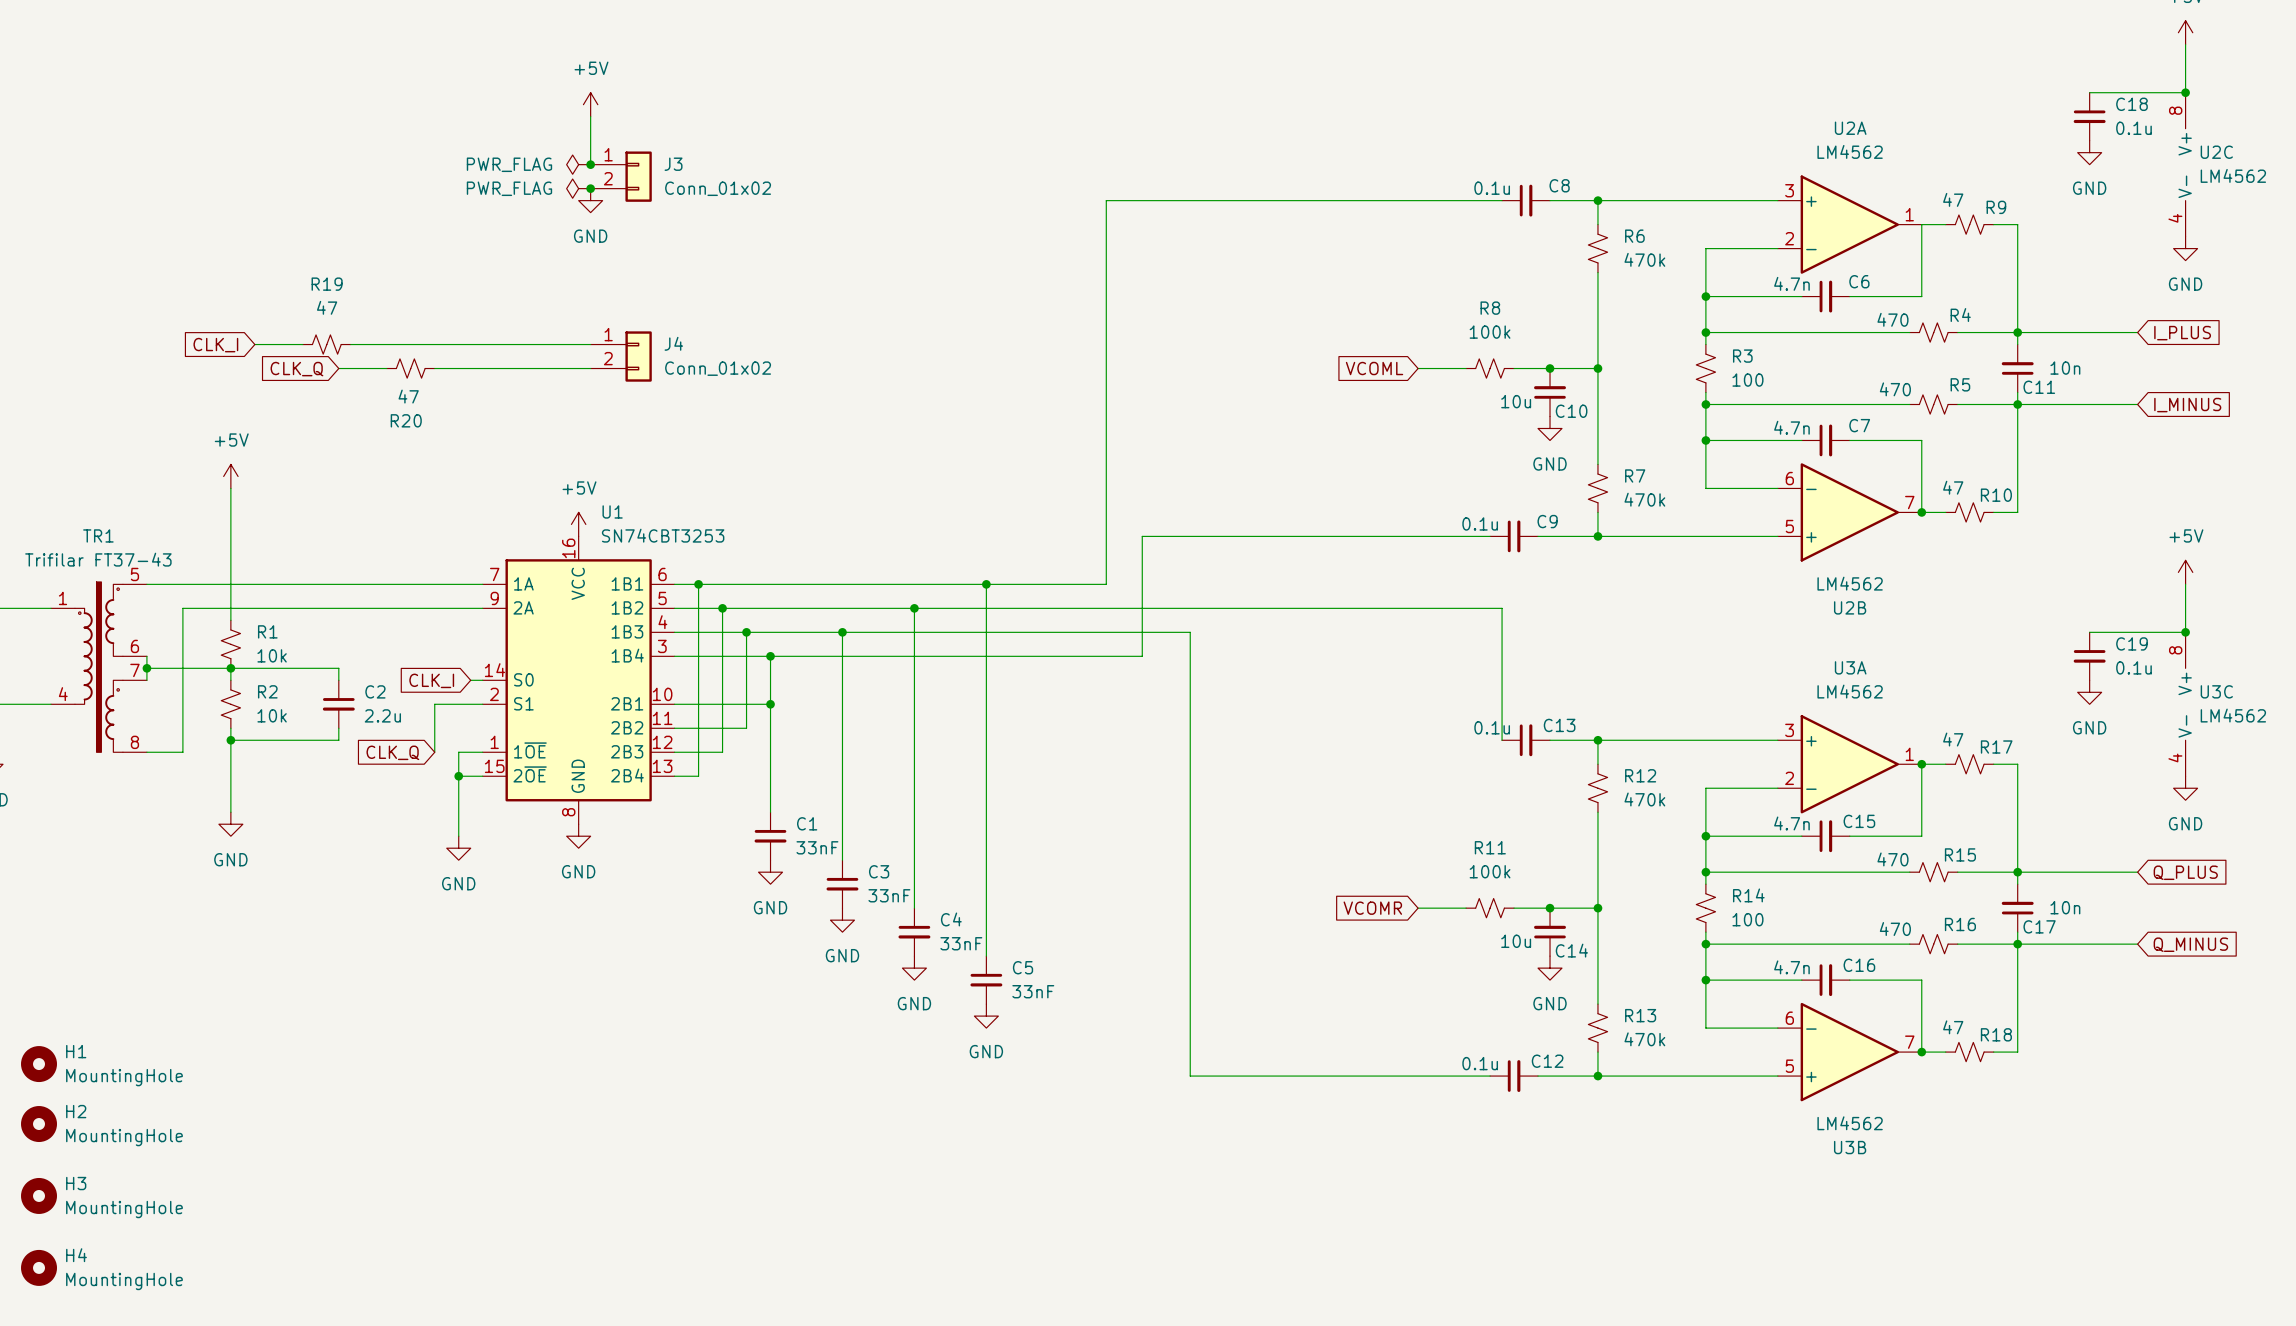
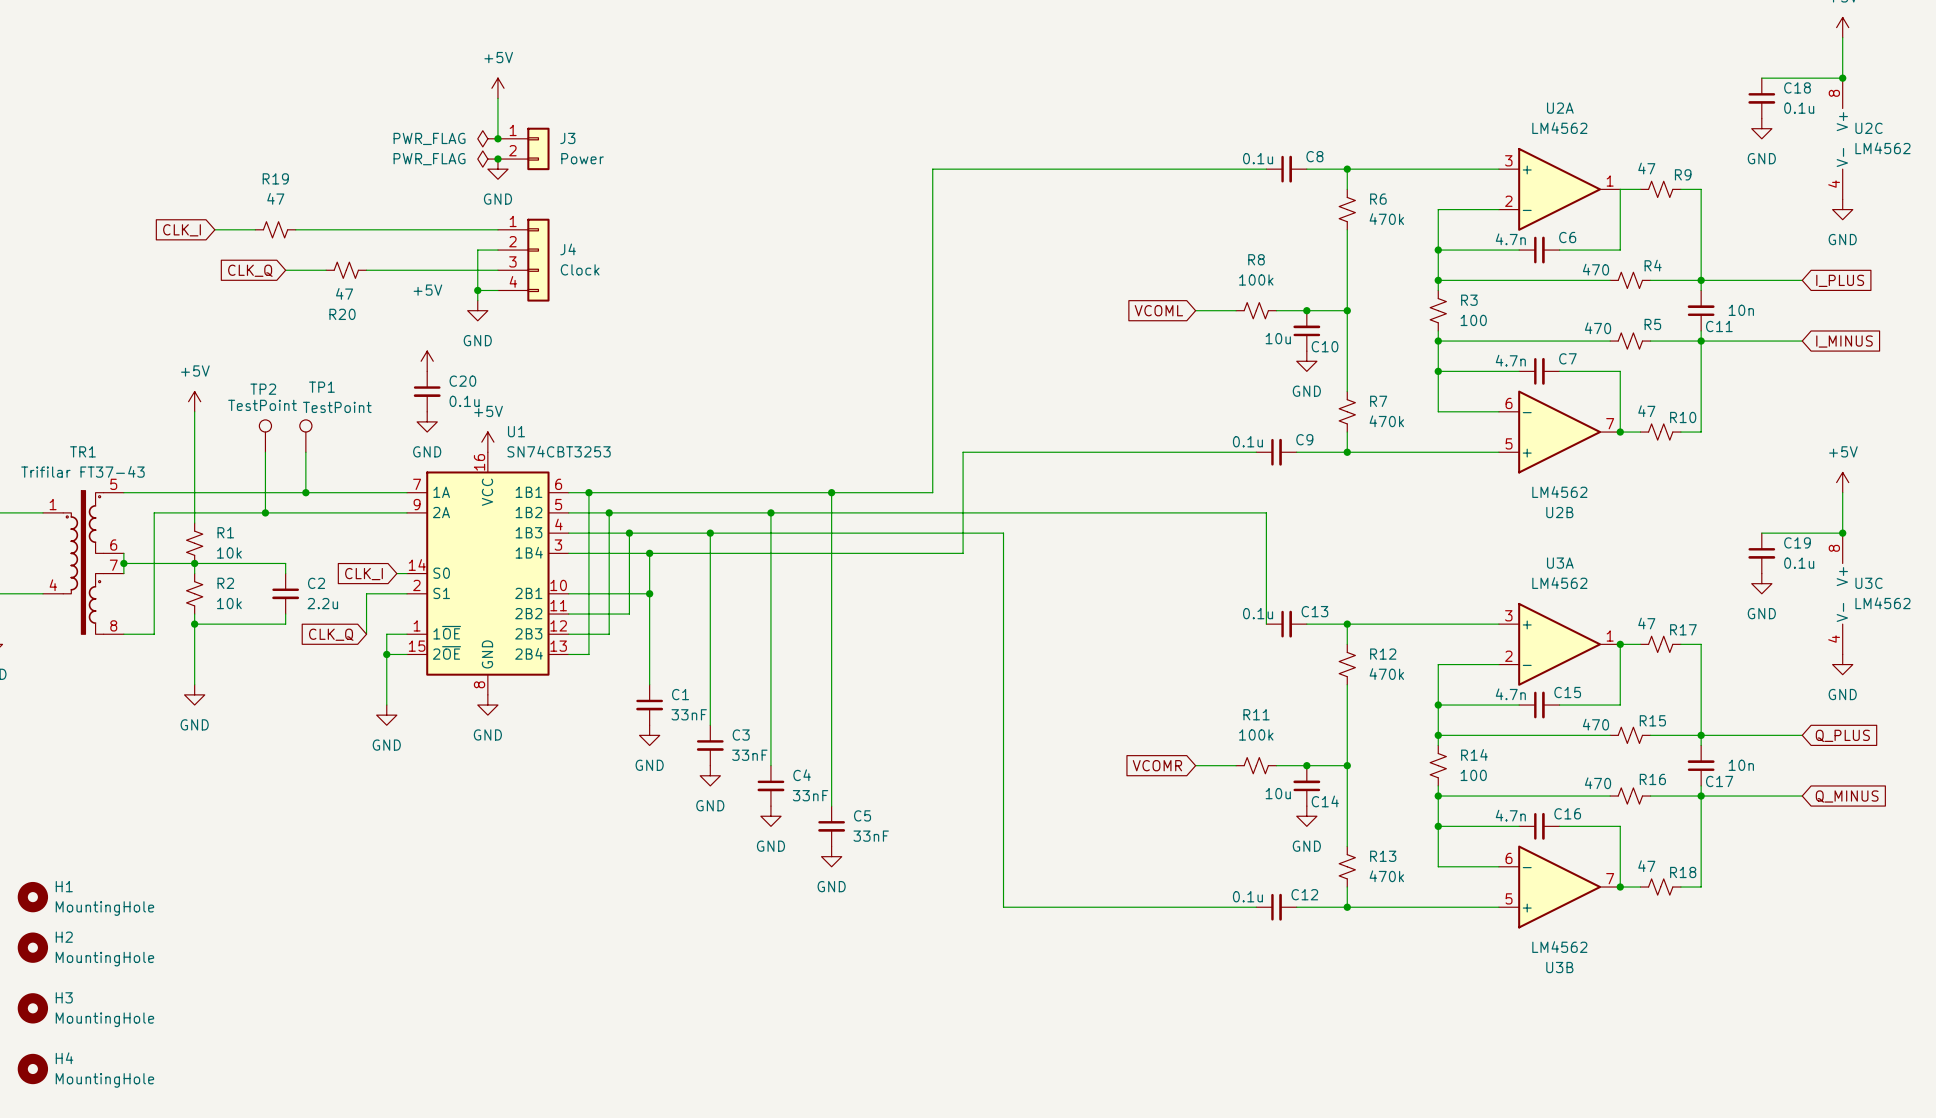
J3 value: Conn_01x02 (718, 188) -> Power (582, 158)
wire: none -> (295, 229) (497, 229)
wire: none -> (497, 250) (477, 250) (477, 300)
J4 symbol: [590, 331, 652, 382] -> [497, 218, 550, 302]
wire: (254, 344) (302, 344) -> (214, 229) (255, 229)
R19 position: (326, 344) -> (275, 229)
wire: (350, 344) (566, 344) -> none
junction: none -> (477, 290)
global label position: CLK_I (215, 345) -> CLK_I (182, 230)
wire: (338, 368) (386, 368) -> (285, 270) (326, 270)
R20 position: (410, 368) -> (346, 270)
wire: (434, 368) (590, 368) -> (366, 270) (497, 270)
power symbol: none -> GND (477, 310)
J4 value: Conn_01x02 (718, 368) -> Clock (580, 269)
global label position: CLK_Q (296, 369) -> CLK_Q (250, 270)
power symbol: none -> +5V (427, 361)
C20: none -> 0.1u (427, 391)
power symbol: none -> GND (427, 421)
TP2: none -> TestPoint (265, 436)
TP1: none -> TestPoint (305, 436)
wire: none -> (265, 452) (265, 512)
wire: none -> (305, 452) (305, 492)
junction: none -> (305, 492)
junction: none -> (265, 512)

